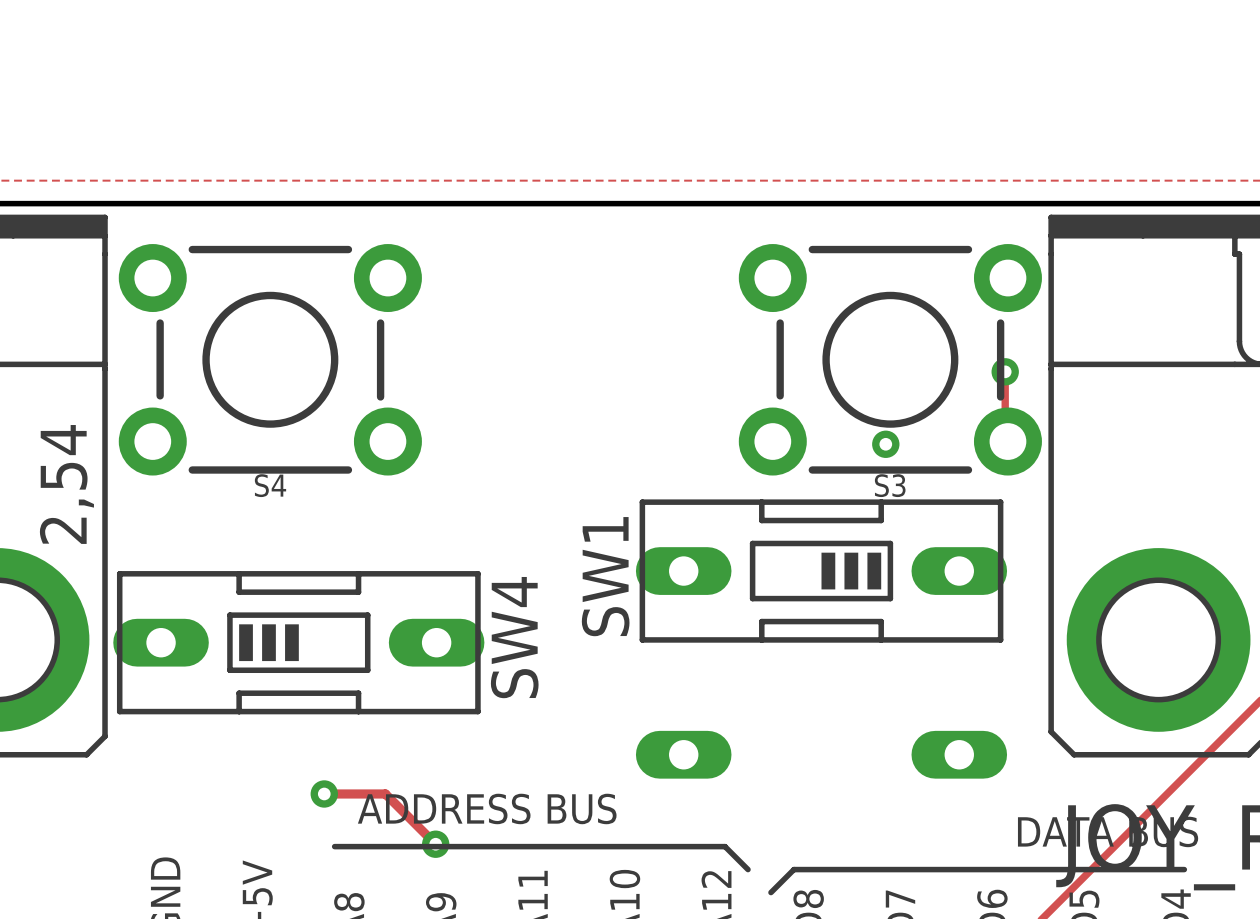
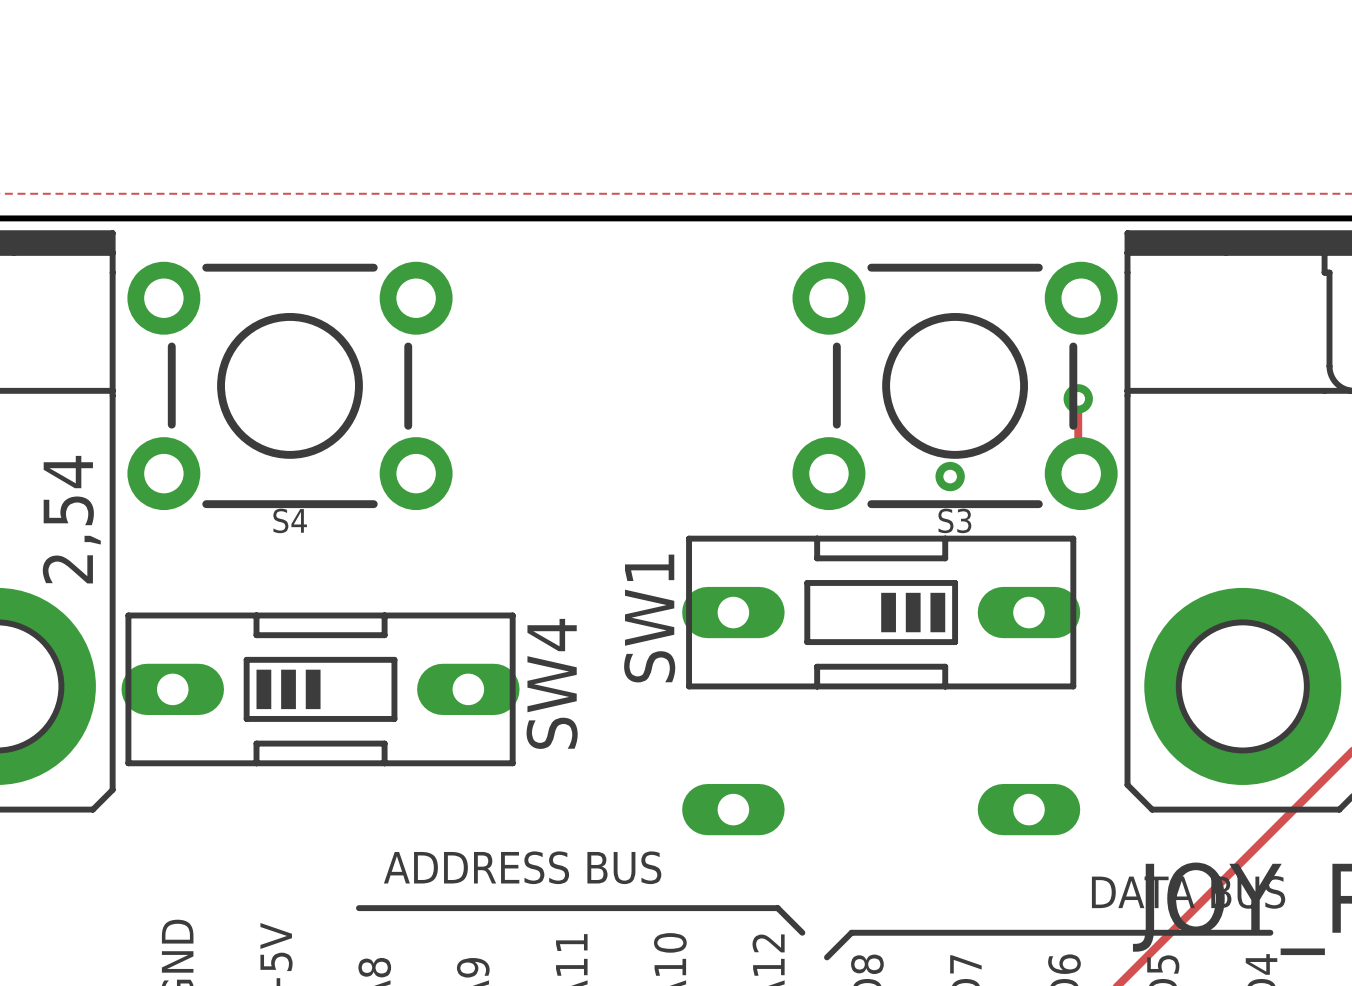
track: (324, 793) (385, 793) (435, 844) -> none
via: (324, 793) -> none
via: (435, 844) -> none

